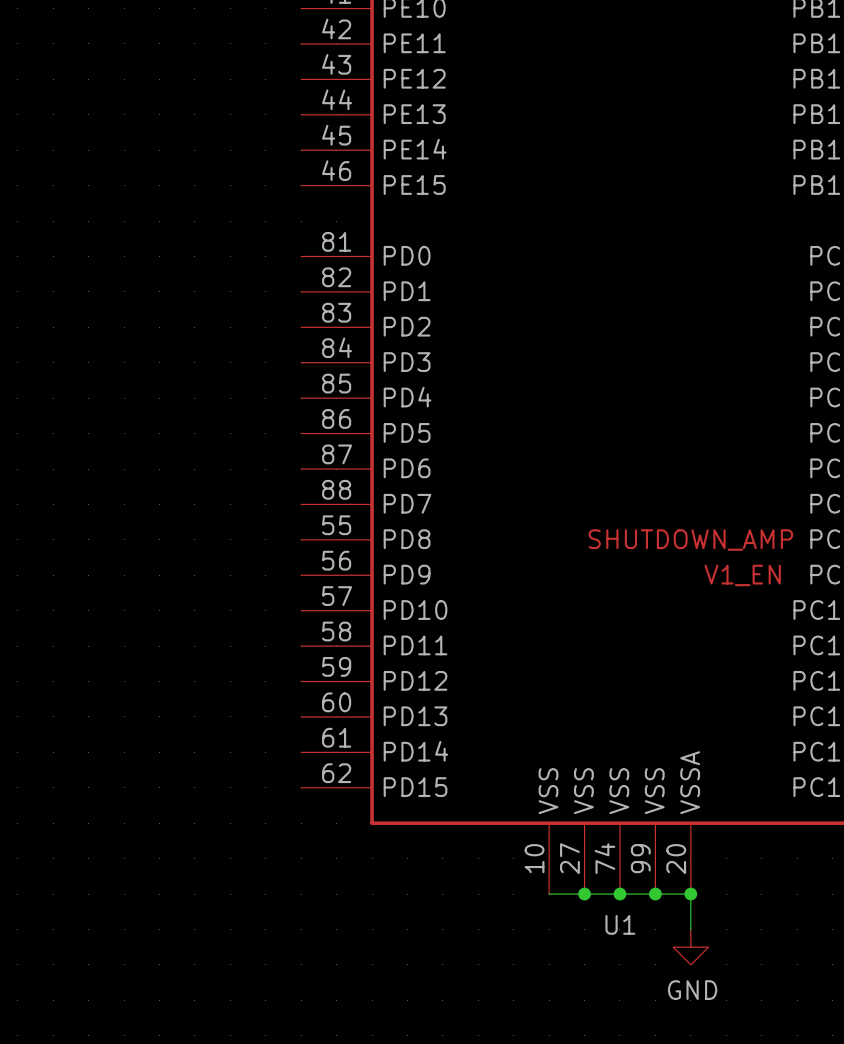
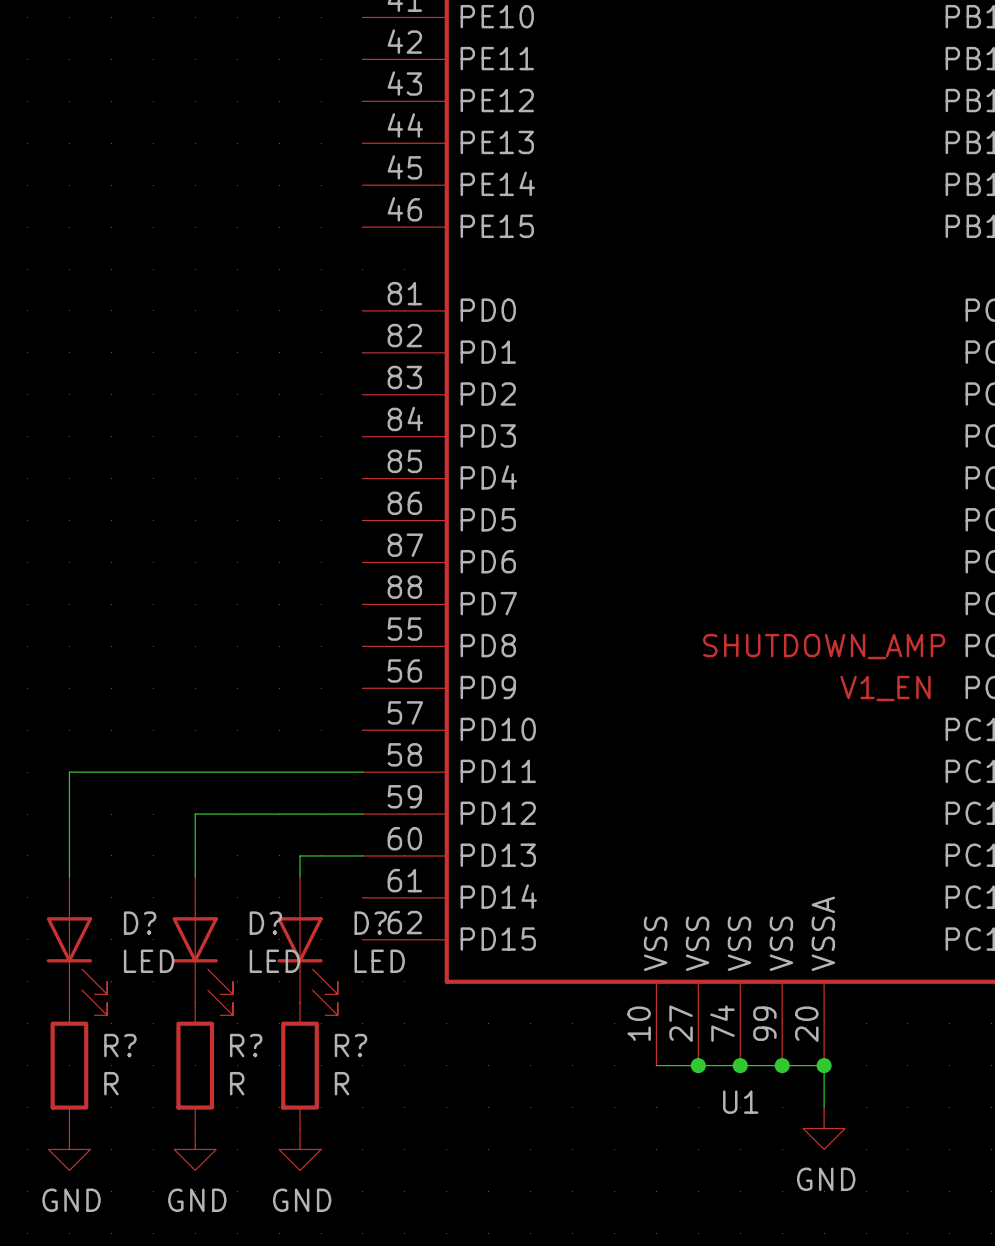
wire: none -> (362, 772) (69, 772) (69, 876)
wire: none -> (362, 814) (195, 814) (195, 876)
wire: none -> (362, 855) (300, 855) (300, 876)
D?: none -> LED (76, 946)
D?: none -> LED (202, 946)
D?: none -> LED (307, 946)
R?: none -> R (69, 1065)
R?: none -> R (195, 1065)
R?: none -> R (300, 1065)
power symbol: none -> GND (69, 1149)
power symbol: none -> GND (195, 1149)
power symbol: none -> GND (300, 1149)

